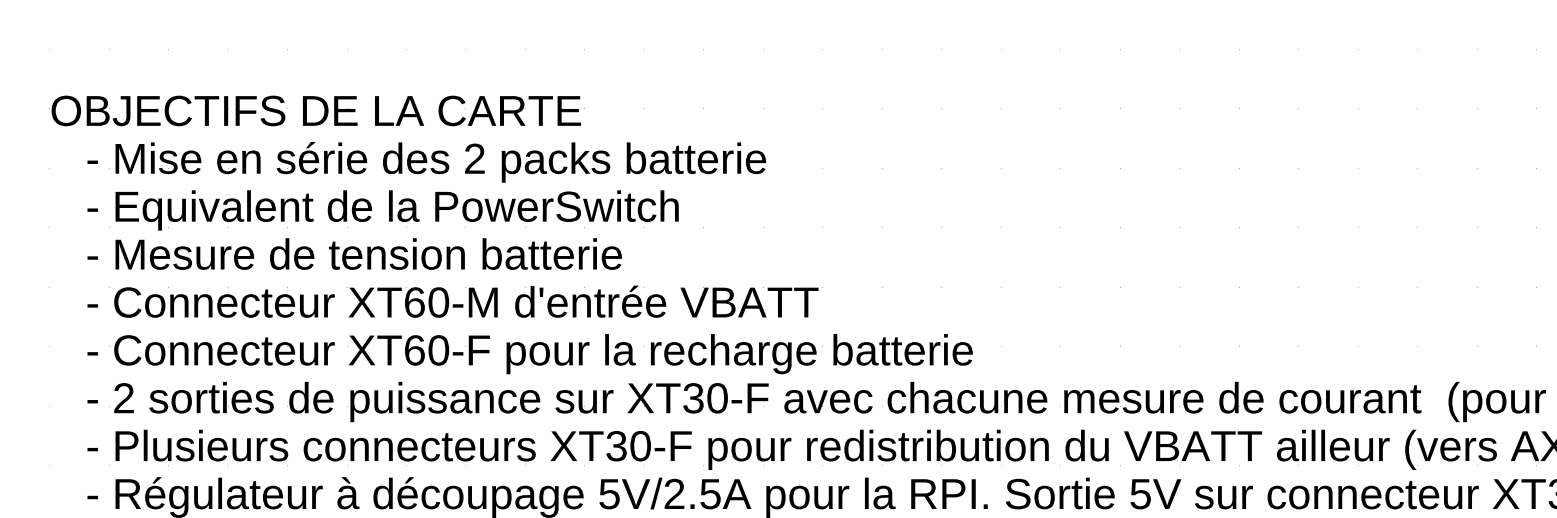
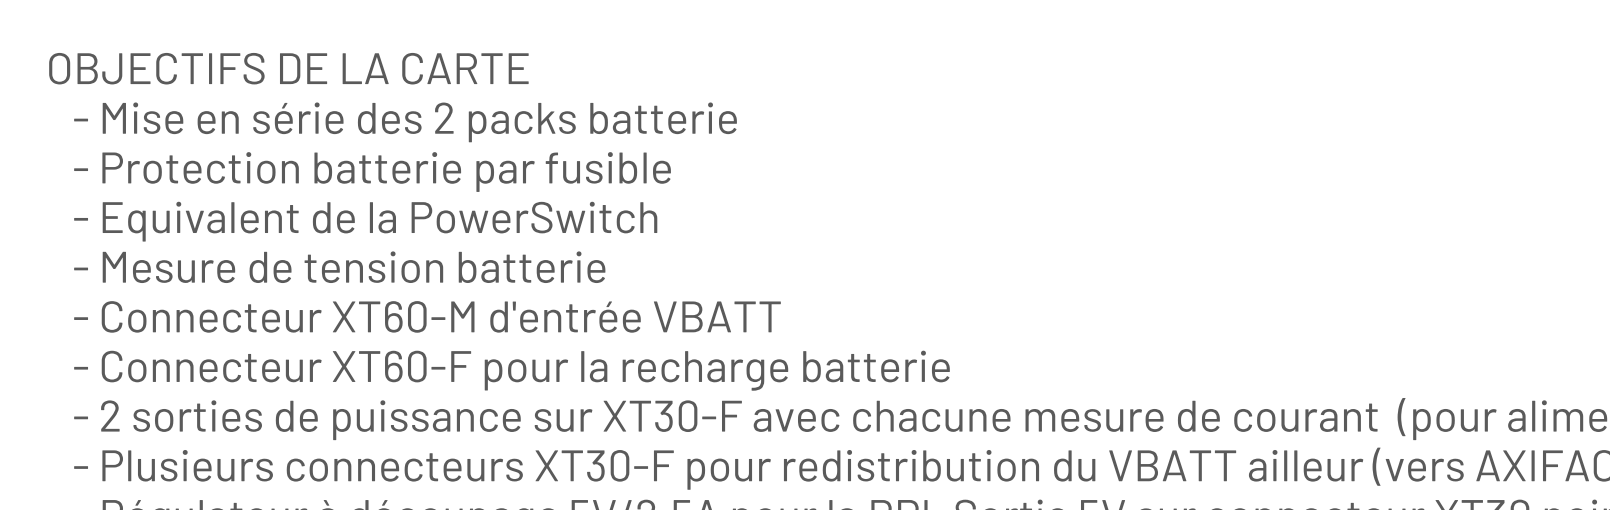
text: none -> OBJECTIFS DE LA CARTE (288, 68)
text: OBJECTIFS DE LA CARTE (316, 110) -> - Mise en série des 2 packs batterie (405, 122)
text: - Mise en série des 2 packs batterie (426, 162) -> - Protection batterie par fusible (372, 172)

